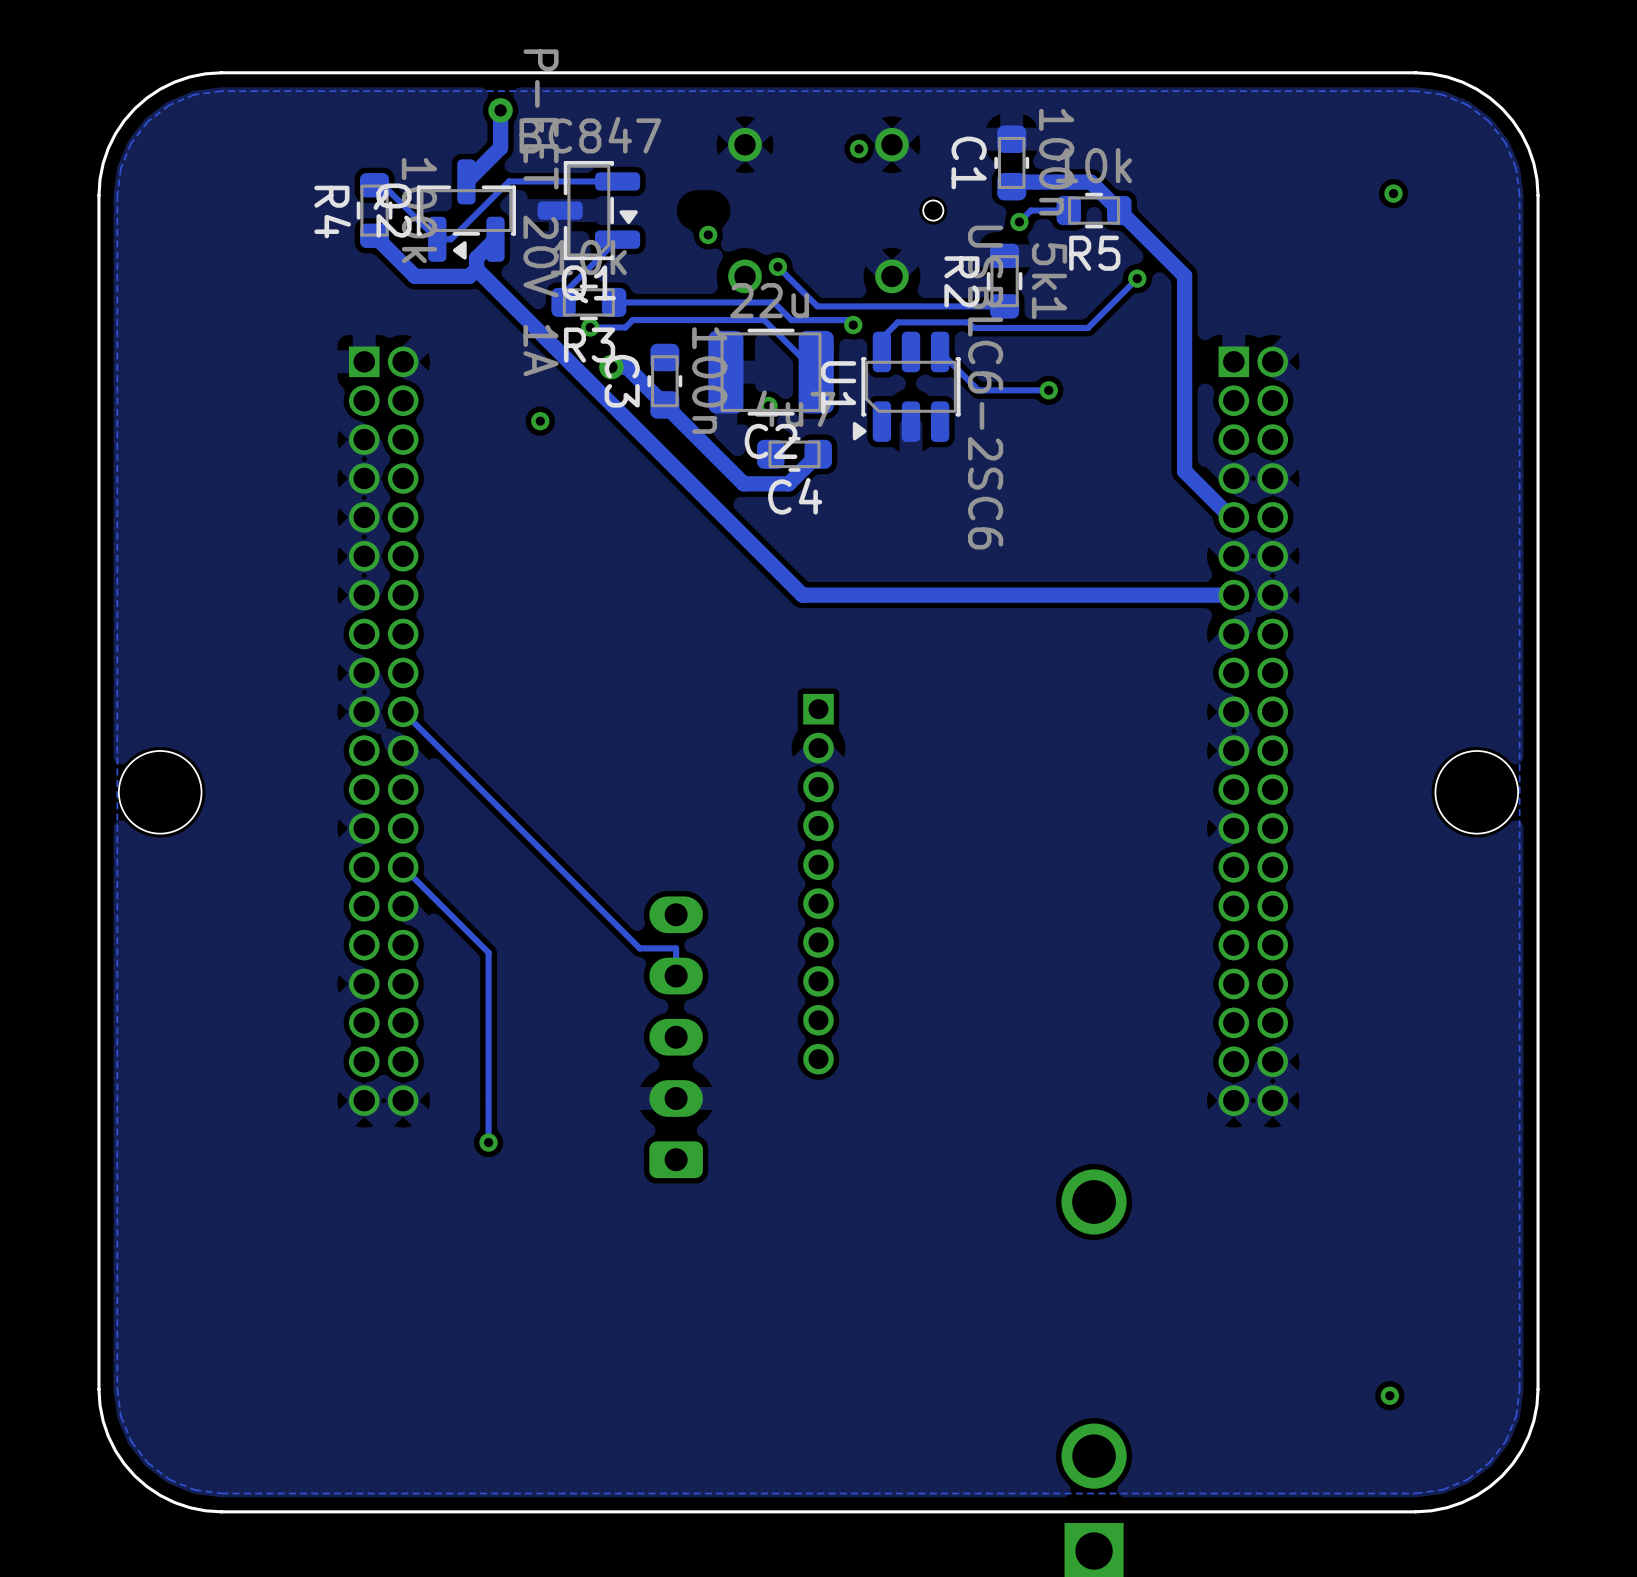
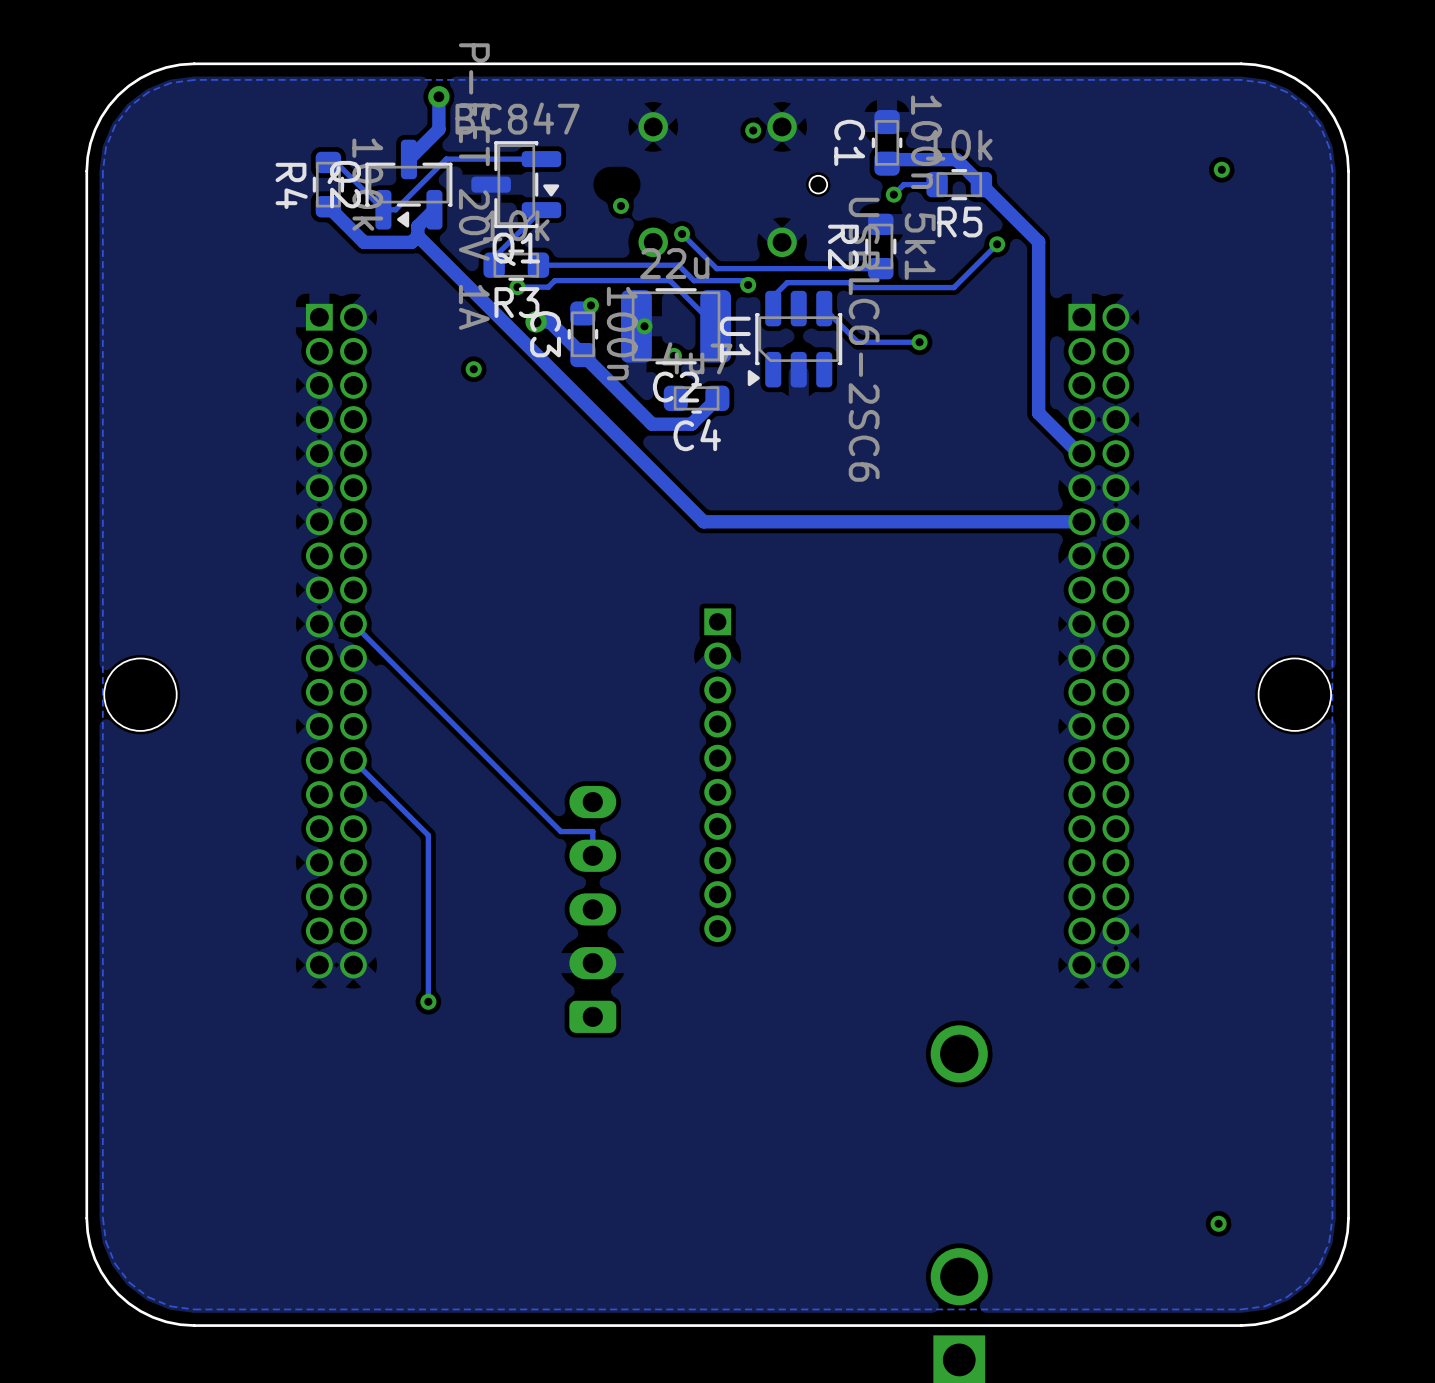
via: none -> (590, 305)
via: none -> (644, 326)

